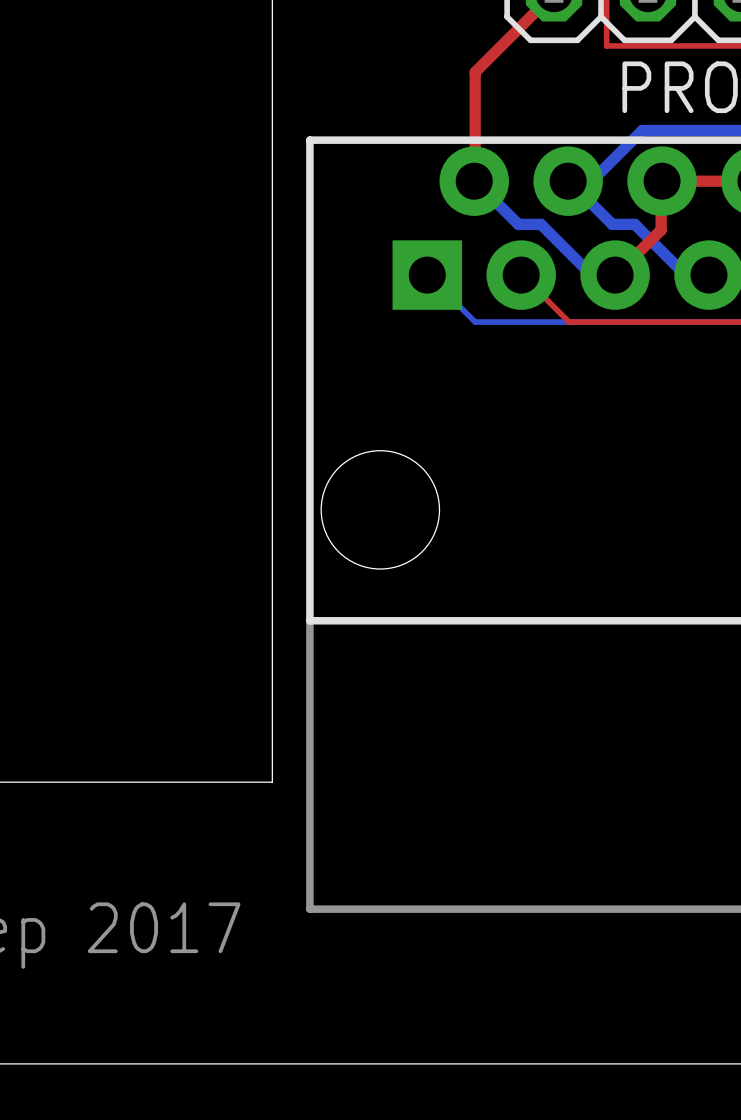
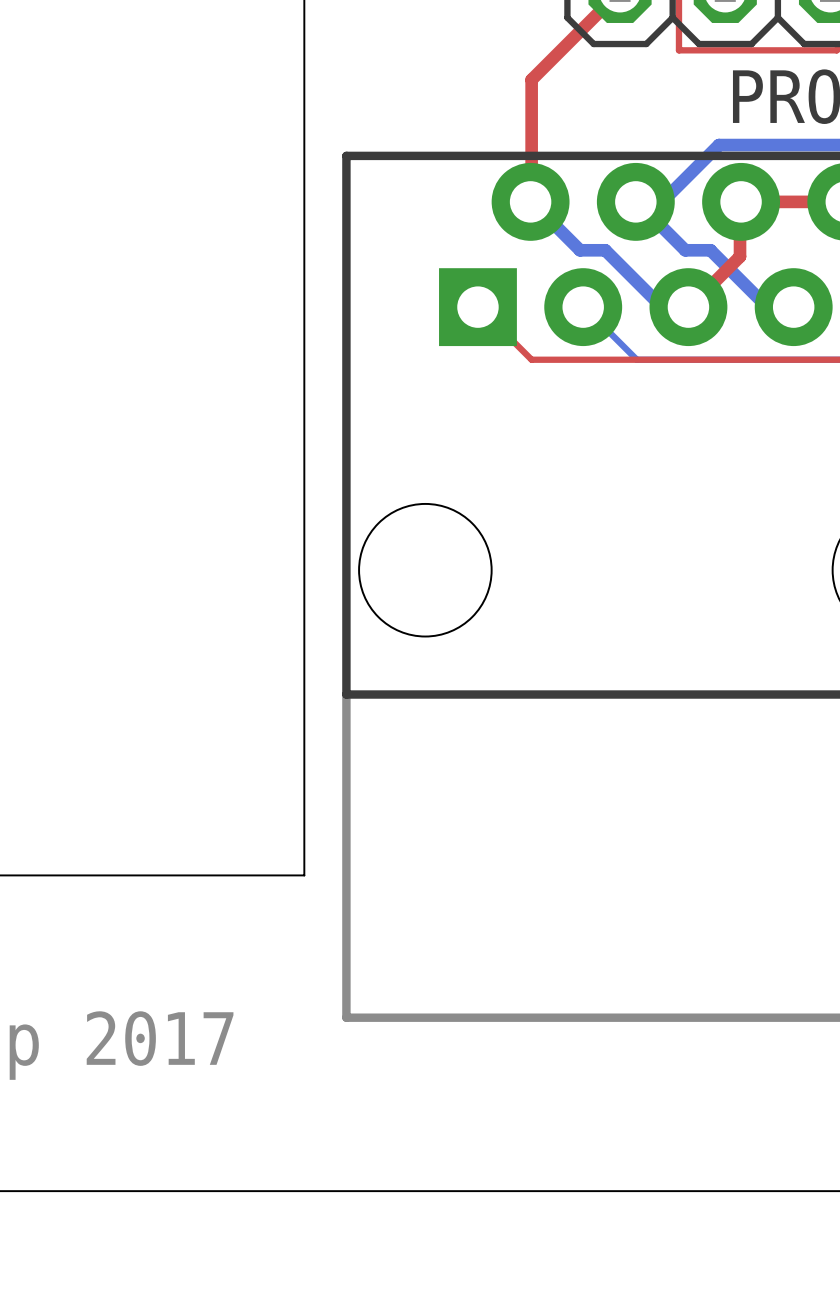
bottom track: (427, 275) (475, 322) (569, 322) -> (583, 307) (636, 359)
top track: (521, 275) (569, 322) -> (477, 307) (531, 359) (636, 359)

